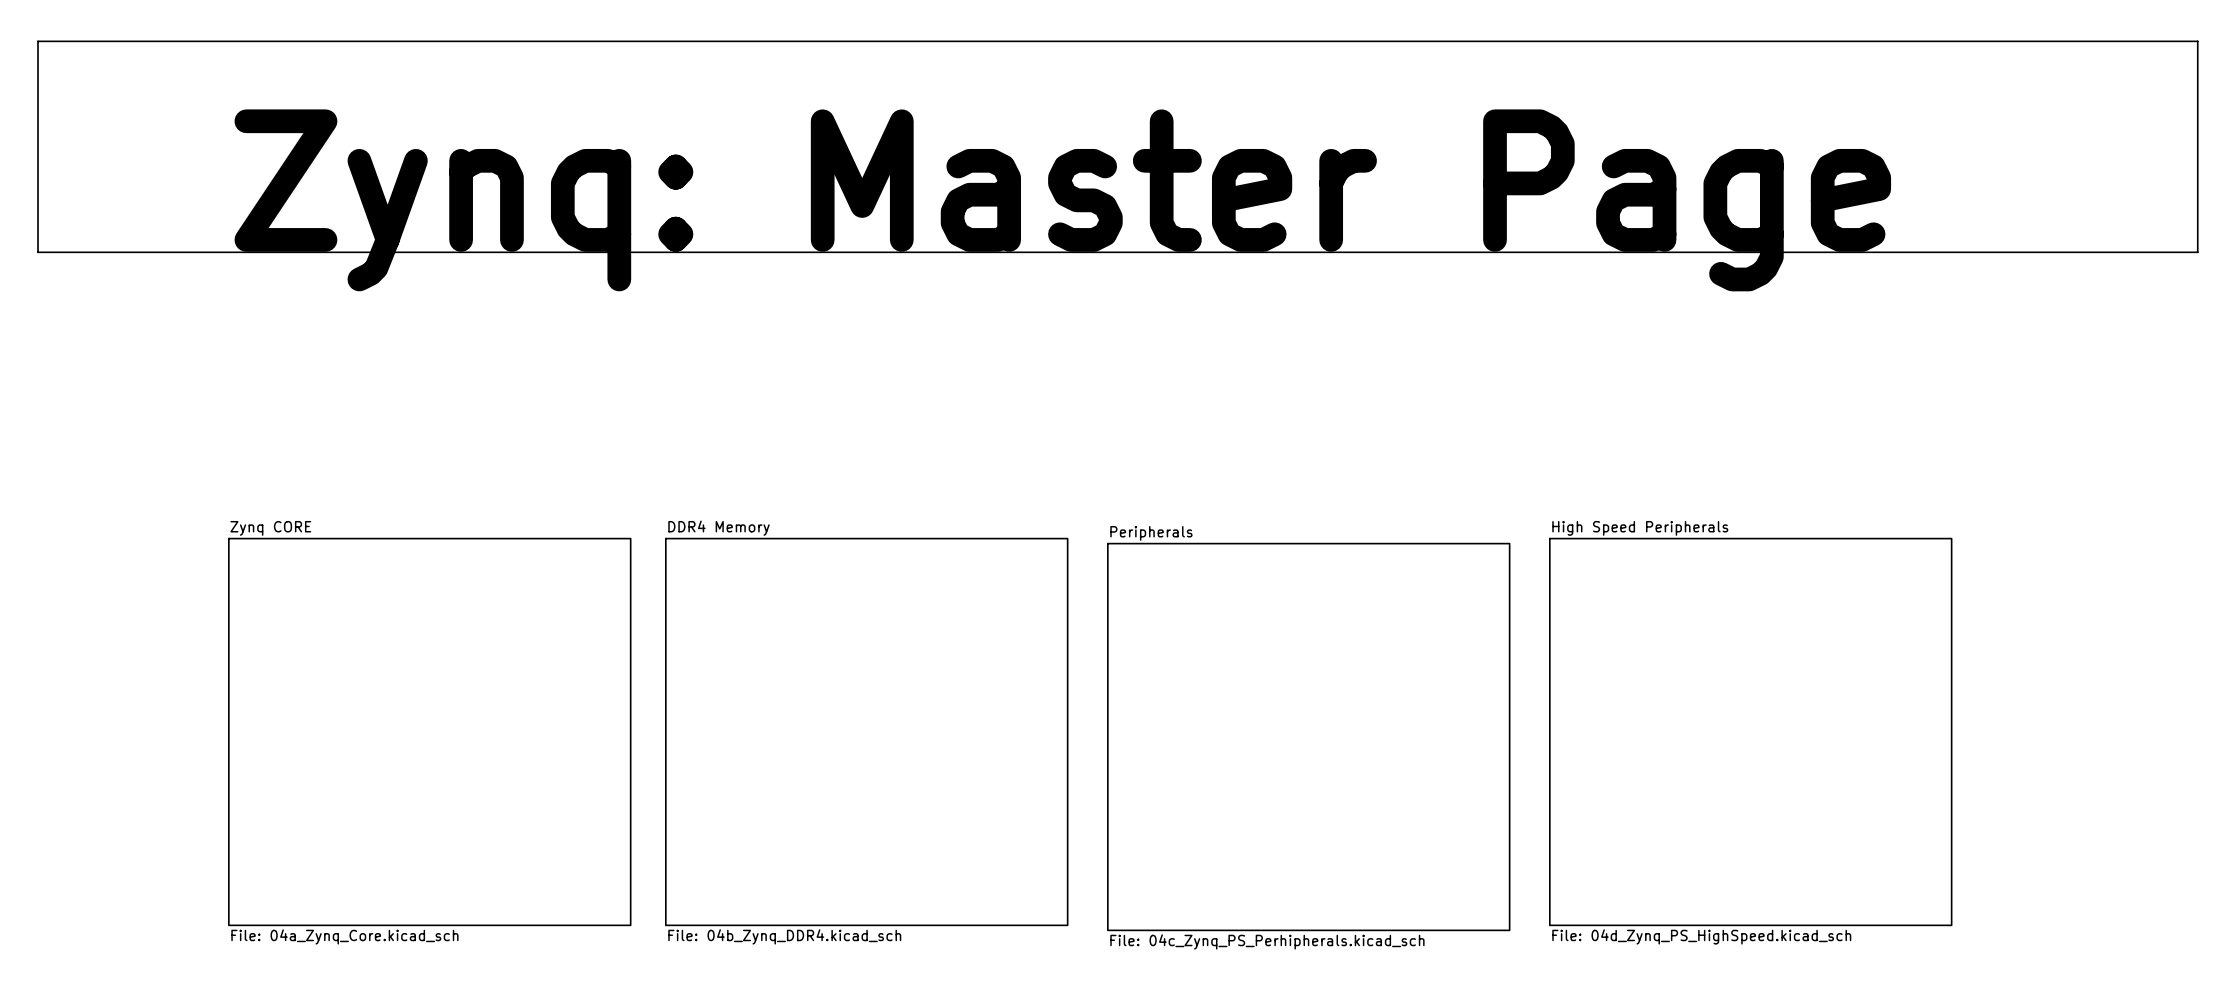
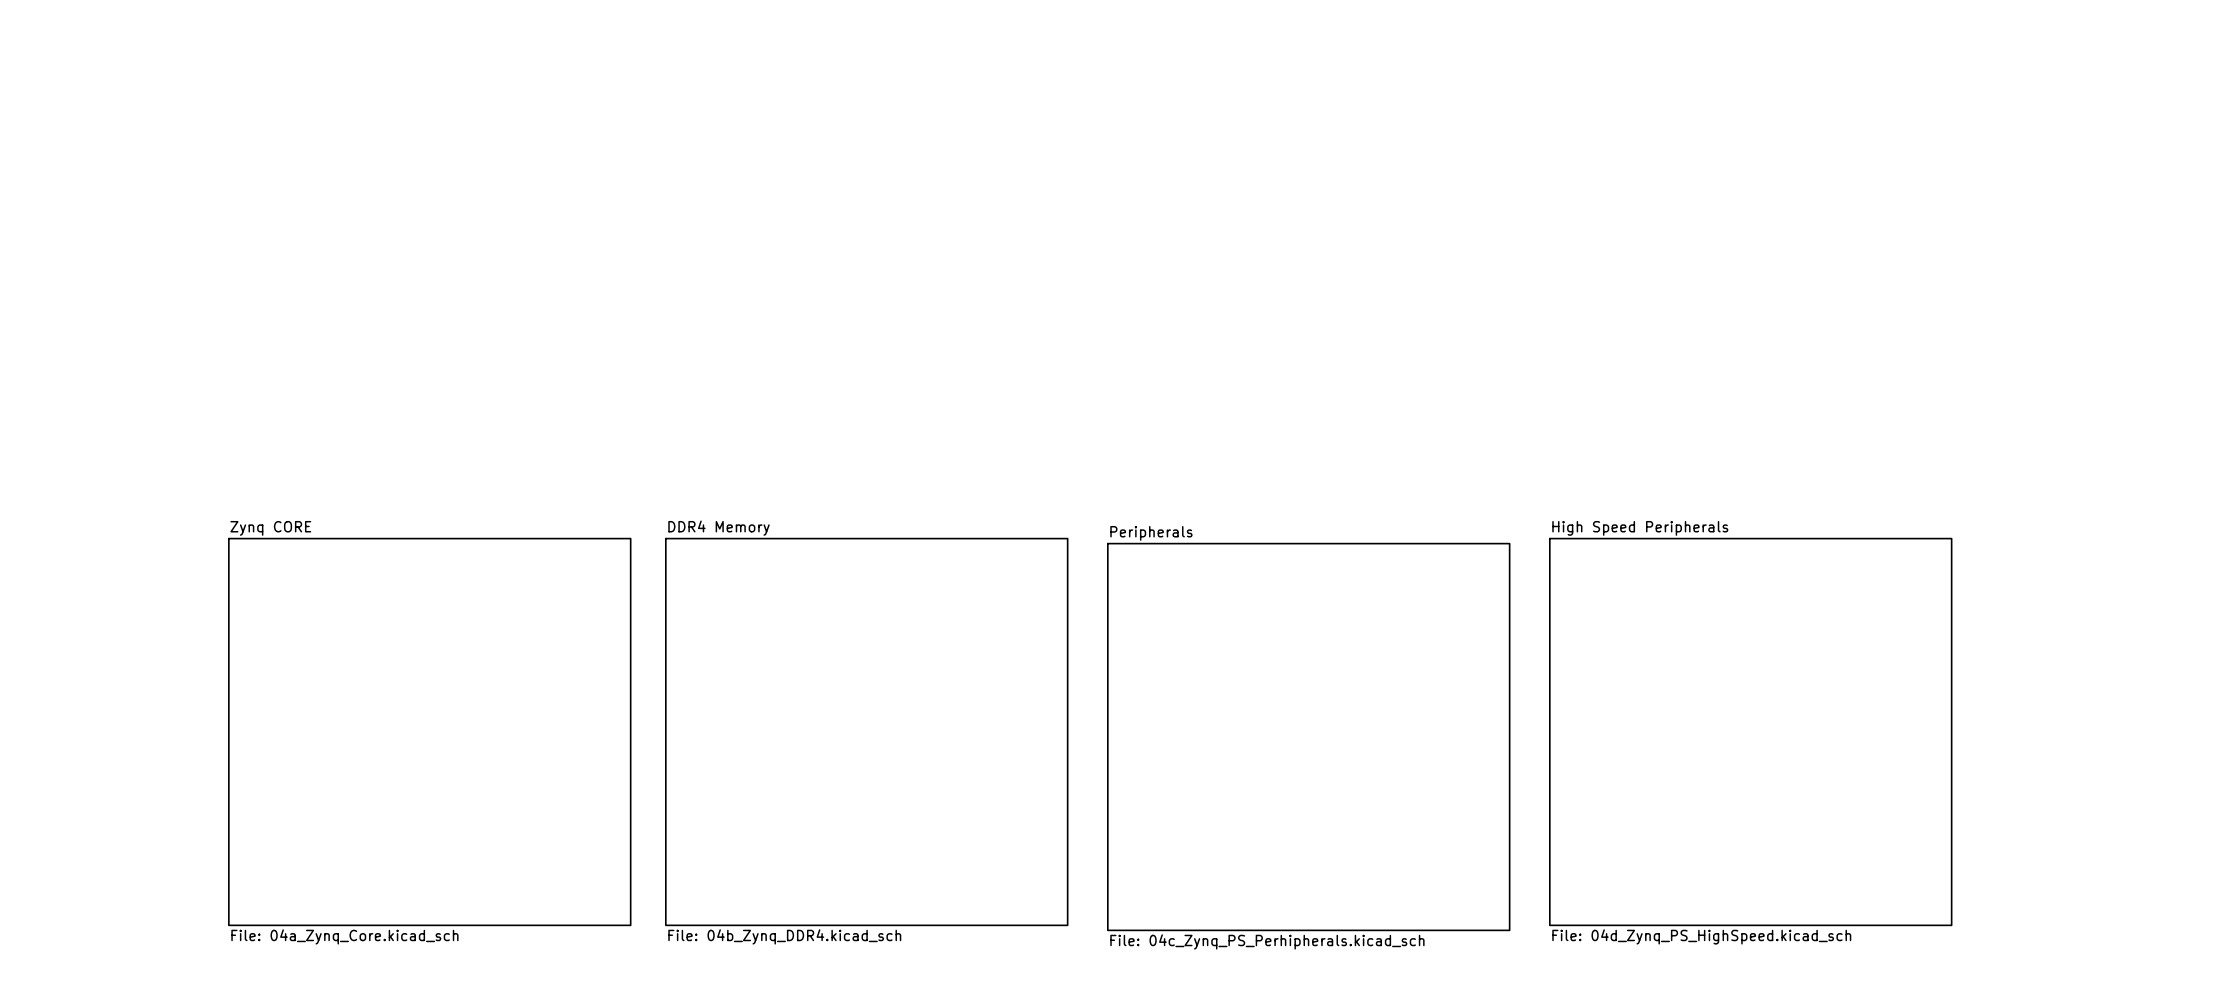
line: (37, 41) (2197, 41) (2197, 252) (37, 252) (37, 41) -> none
text: Zynq: Master Page (1062, 200) -> none

